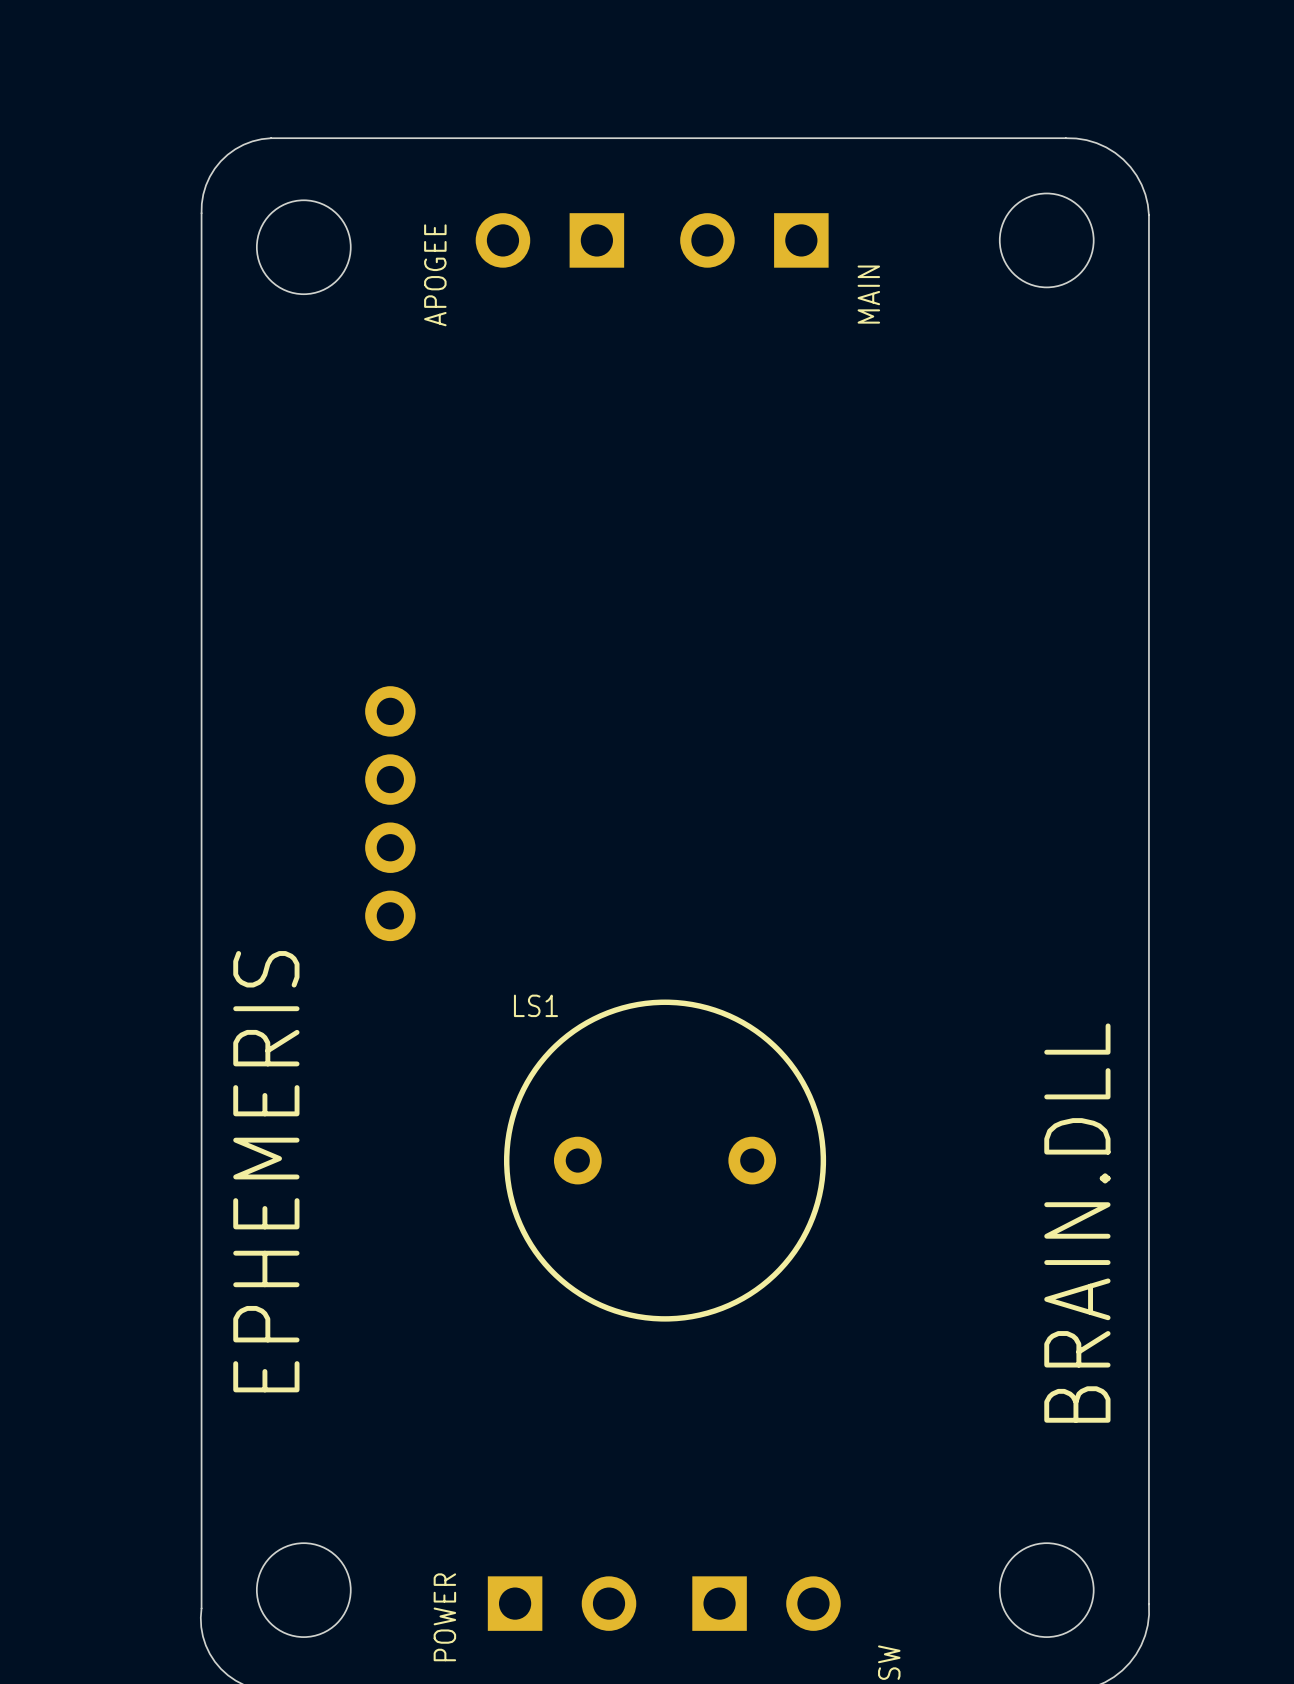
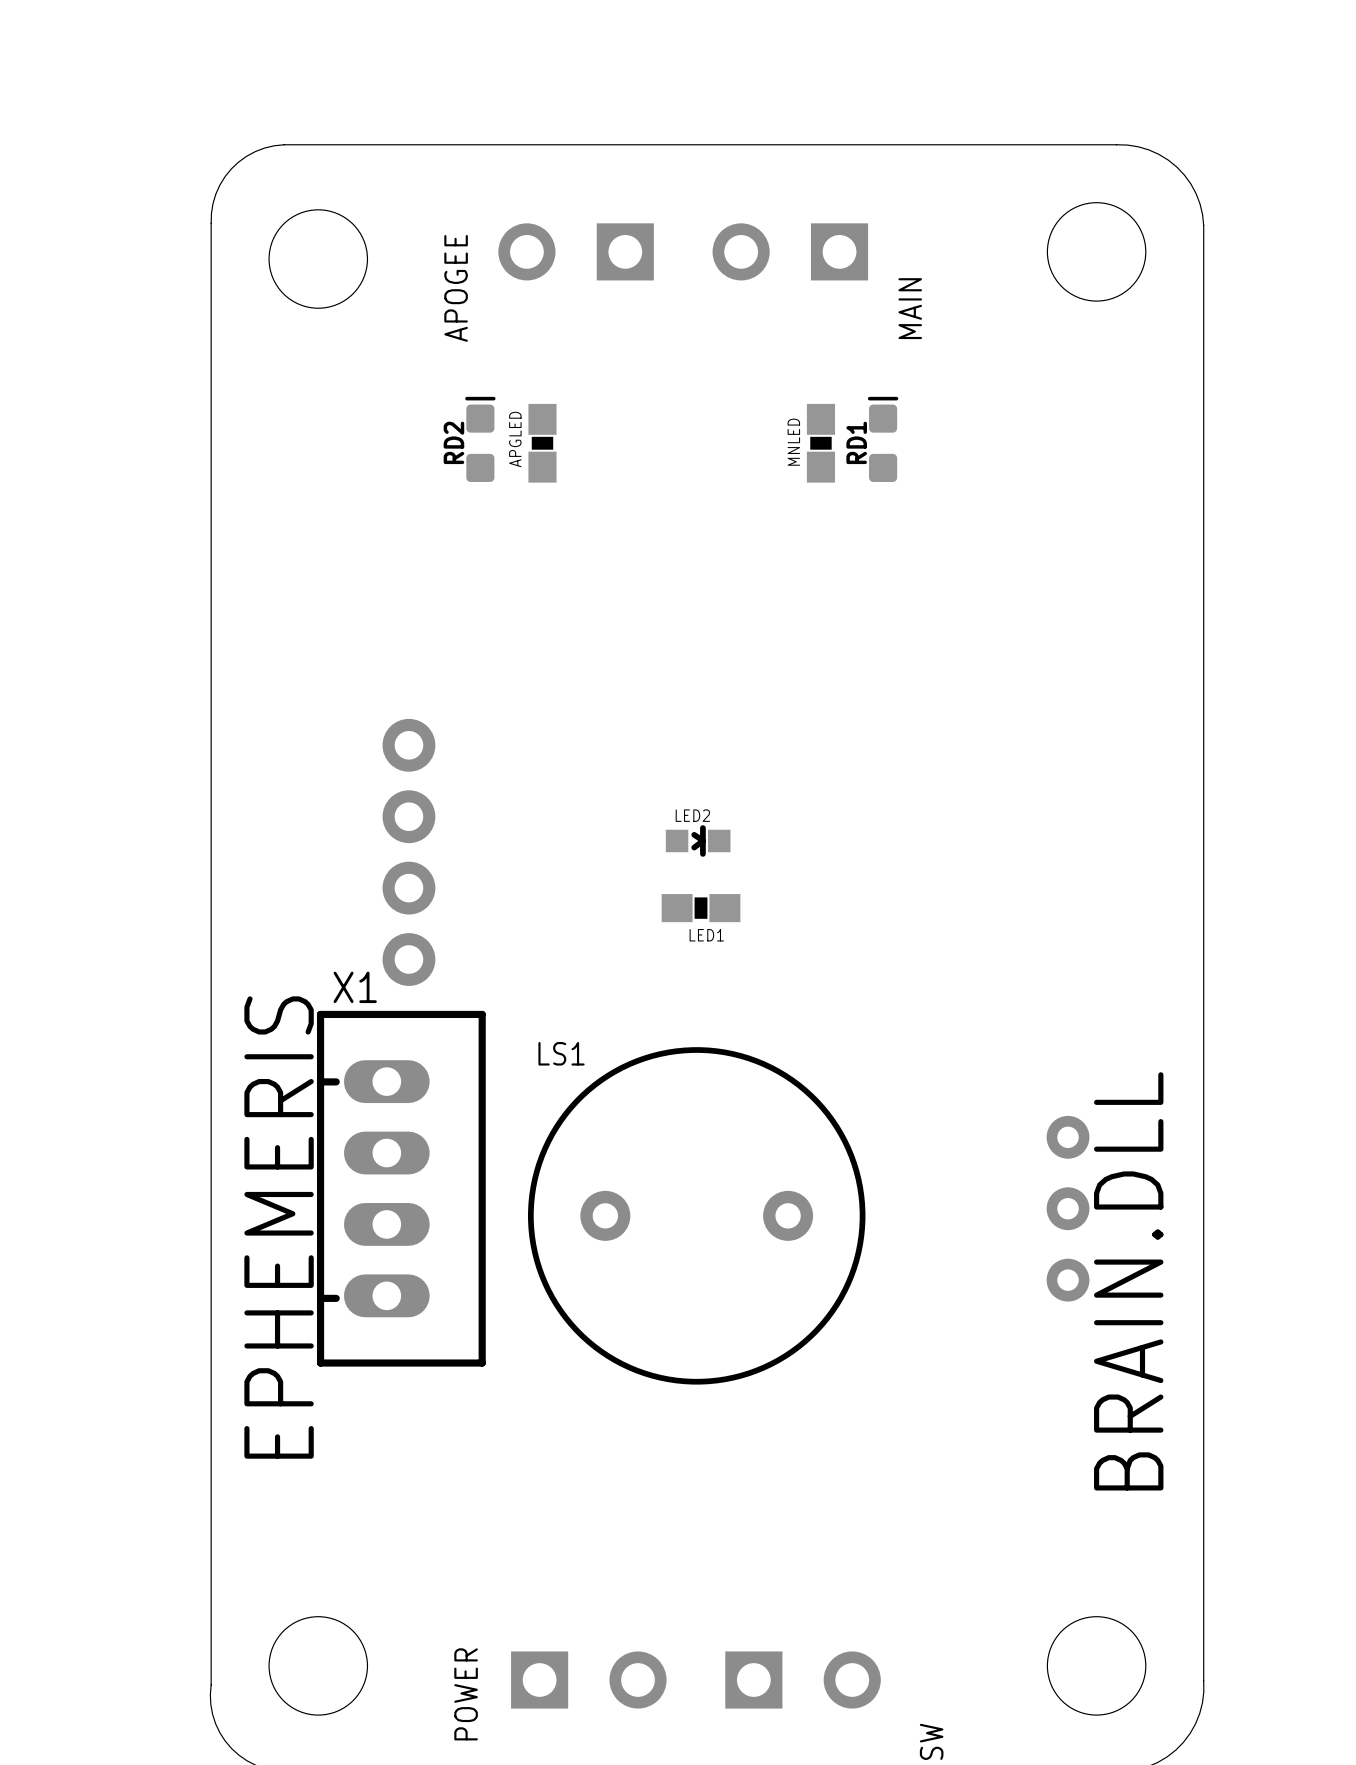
RD2: none -> (480, 439)
RD1: none -> (883, 439)
APGLED: none -> (542, 443)
MNLED: none -> (820, 443)
LED2: none -> (698, 840)
LED1: none -> (701, 908)
X1: none -> (401, 1188)
part: none -> (1068, 1208)

